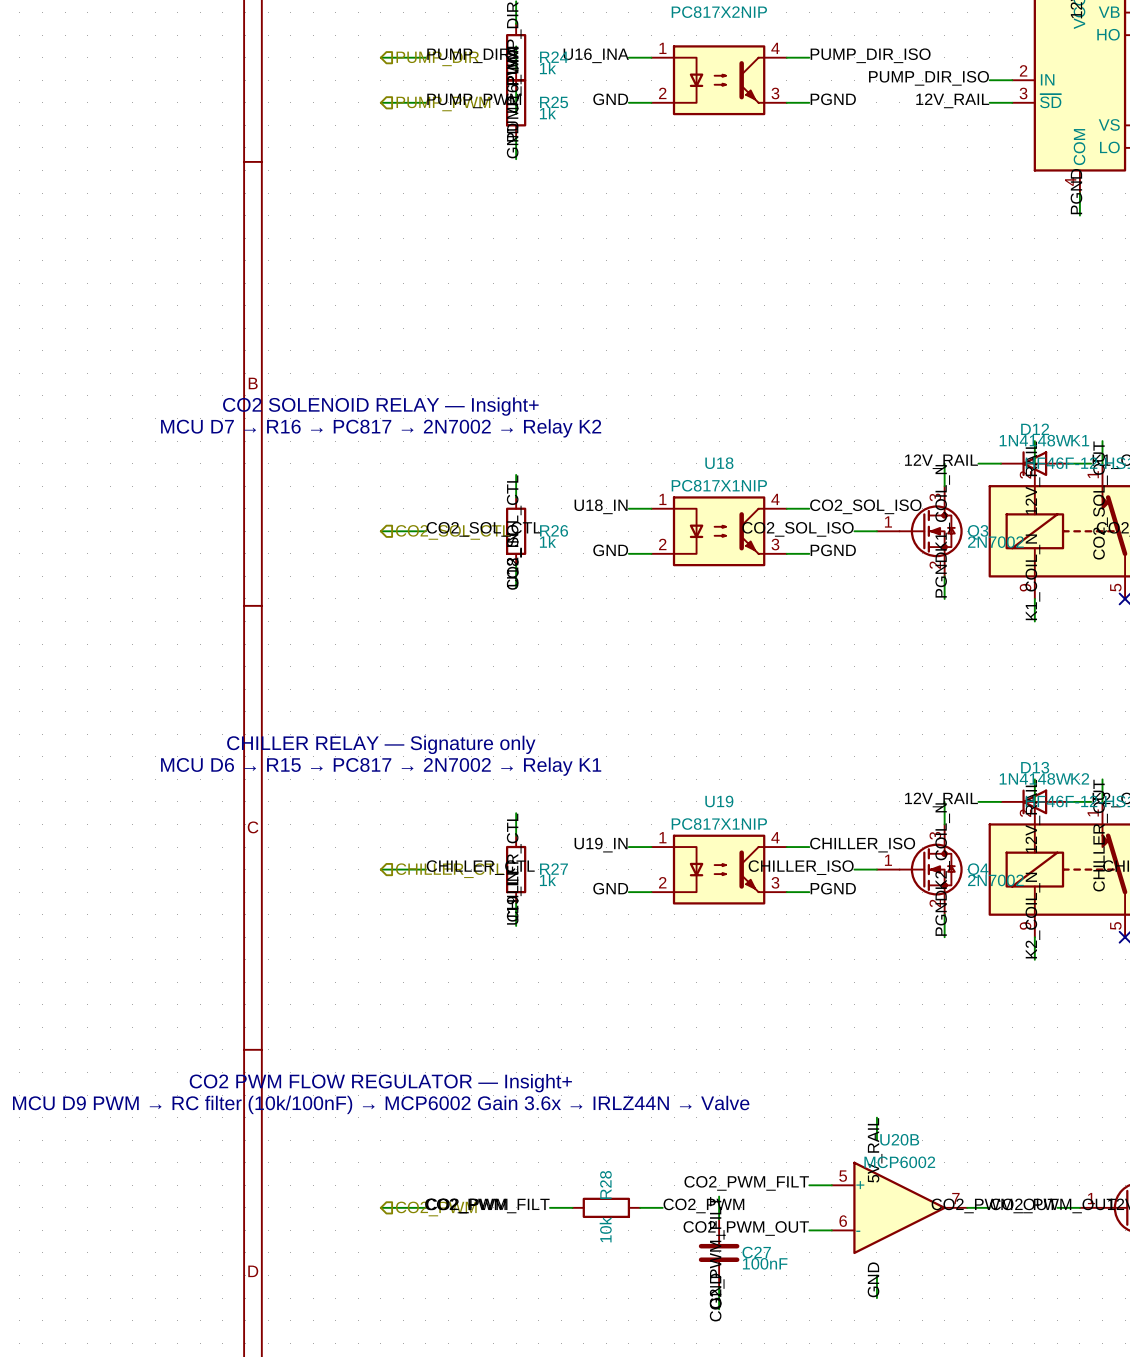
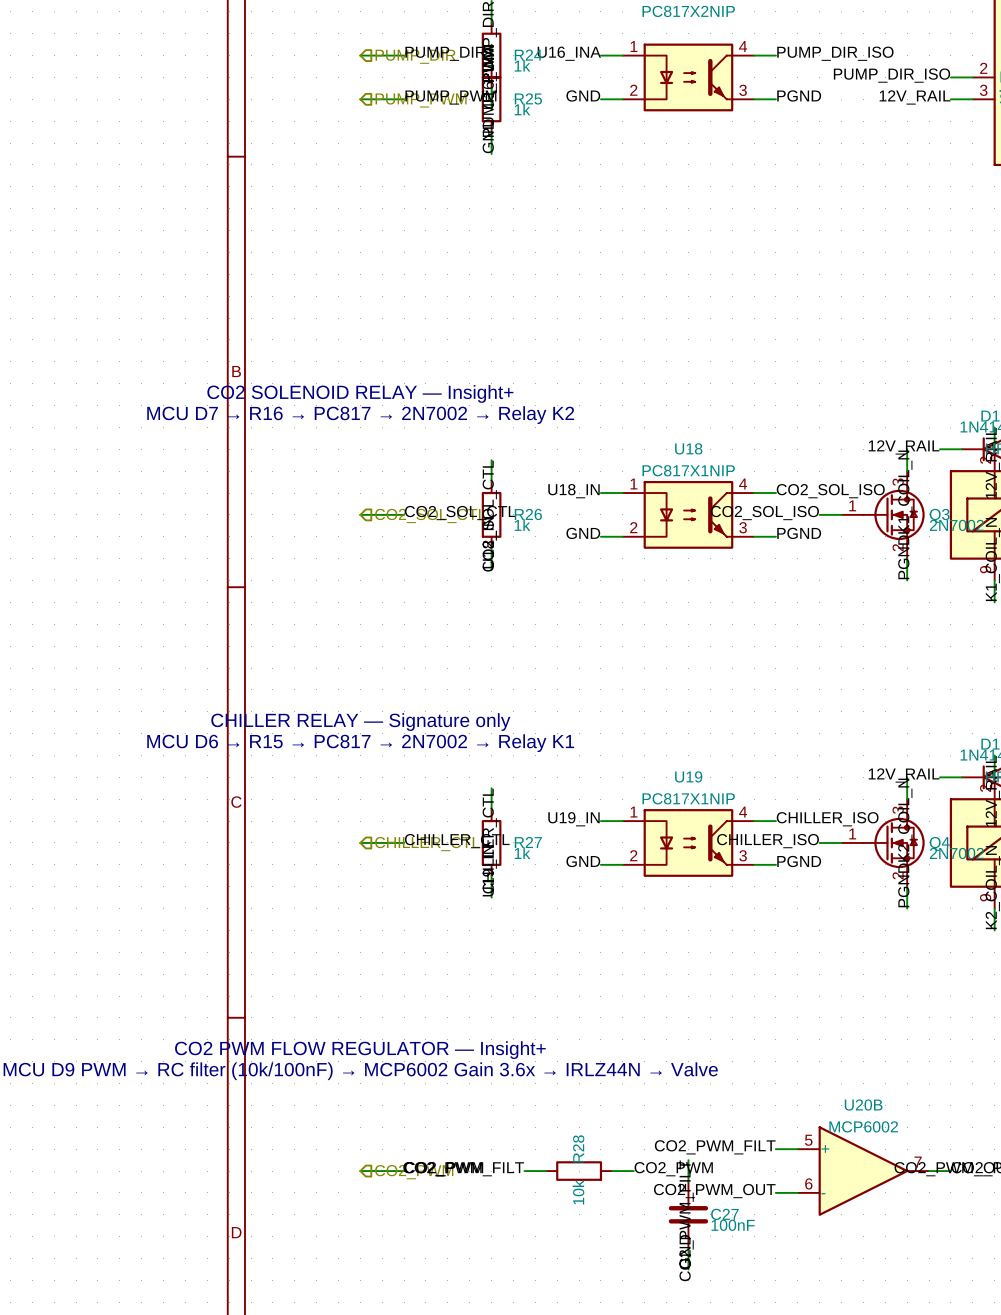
wire: (876, 1117) (876, 1140) -> none
label: 5V_RAIL (875, 1150) -> none
wire: (876, 1275) (876, 1298) -> none
label: GND (873, 1279) -> none

